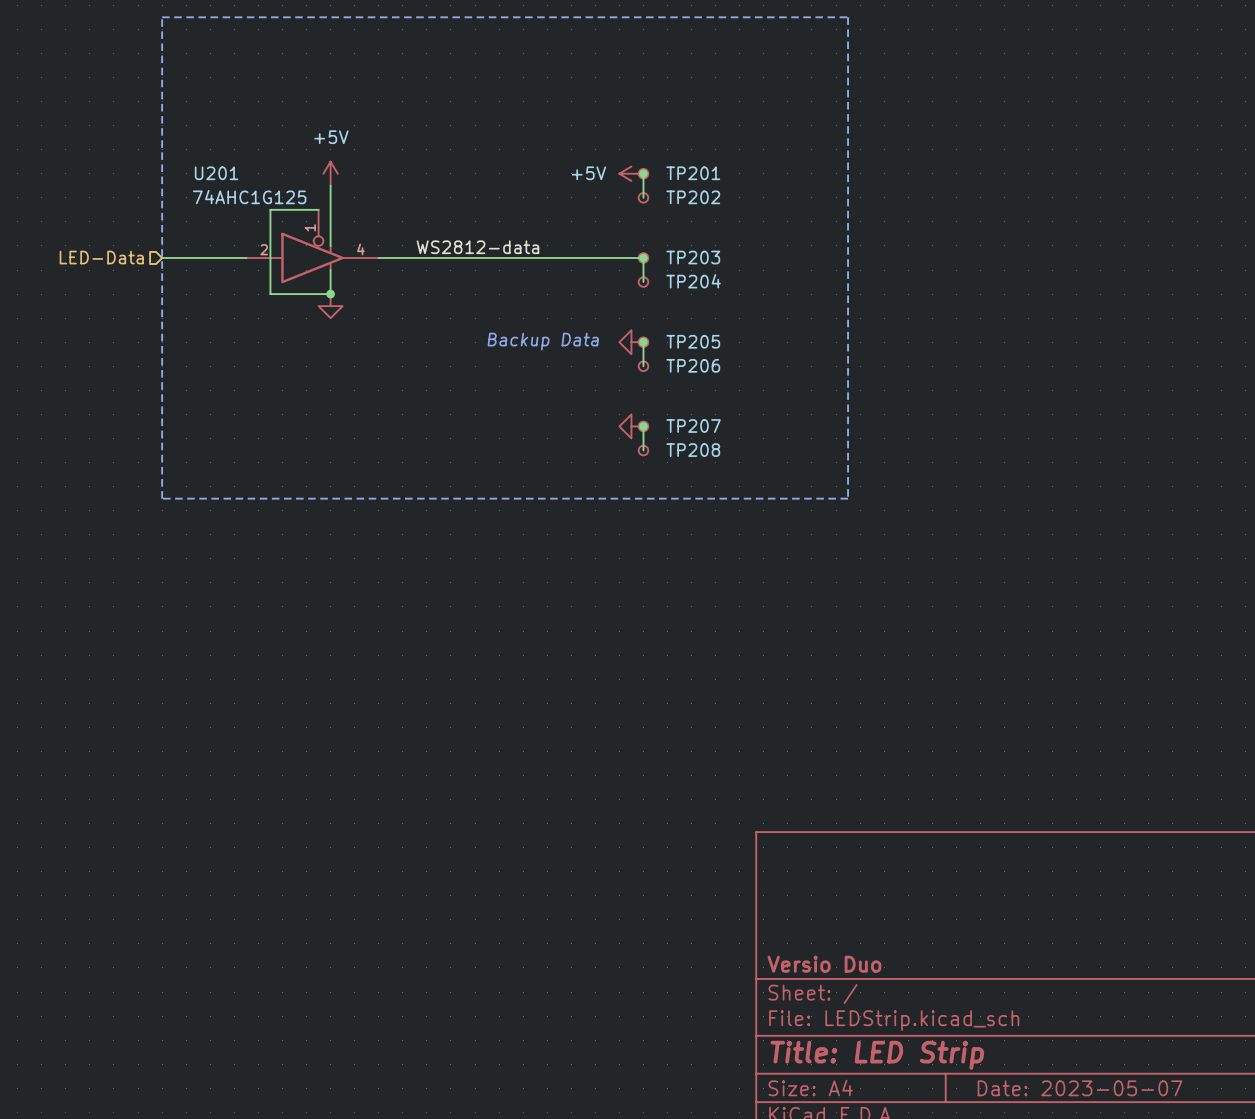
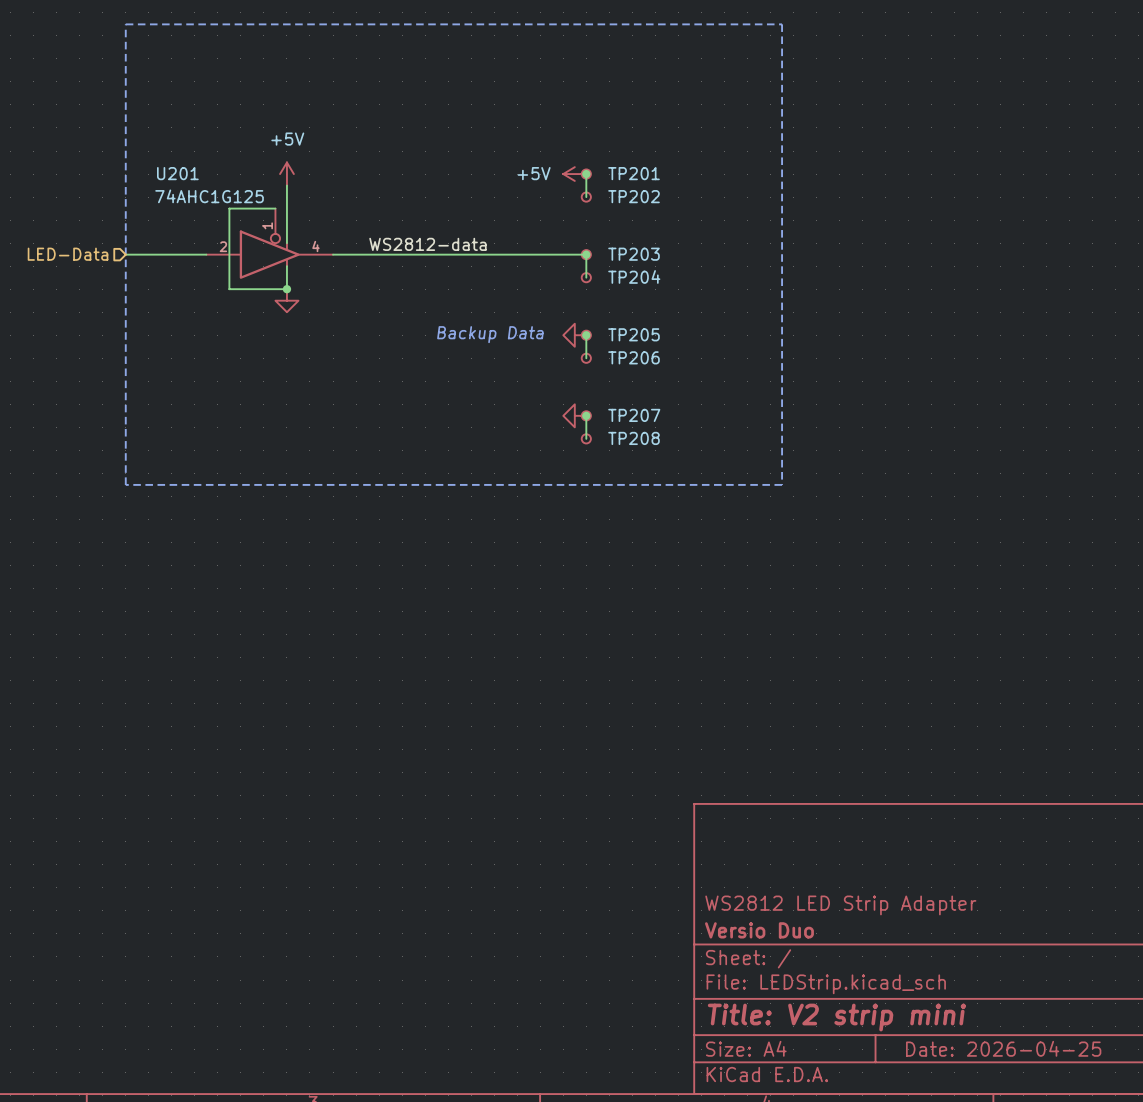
title block: none -> WS2812 LED Strip Adapter (840, 905)
title block: Title: LED Strip (877, 1055) -> Title: V2 strip mini (836, 1017)
title block: Date: 2023-05-07 (1080, 1088) -> Date: 2026-04-25 (1003, 1048)

